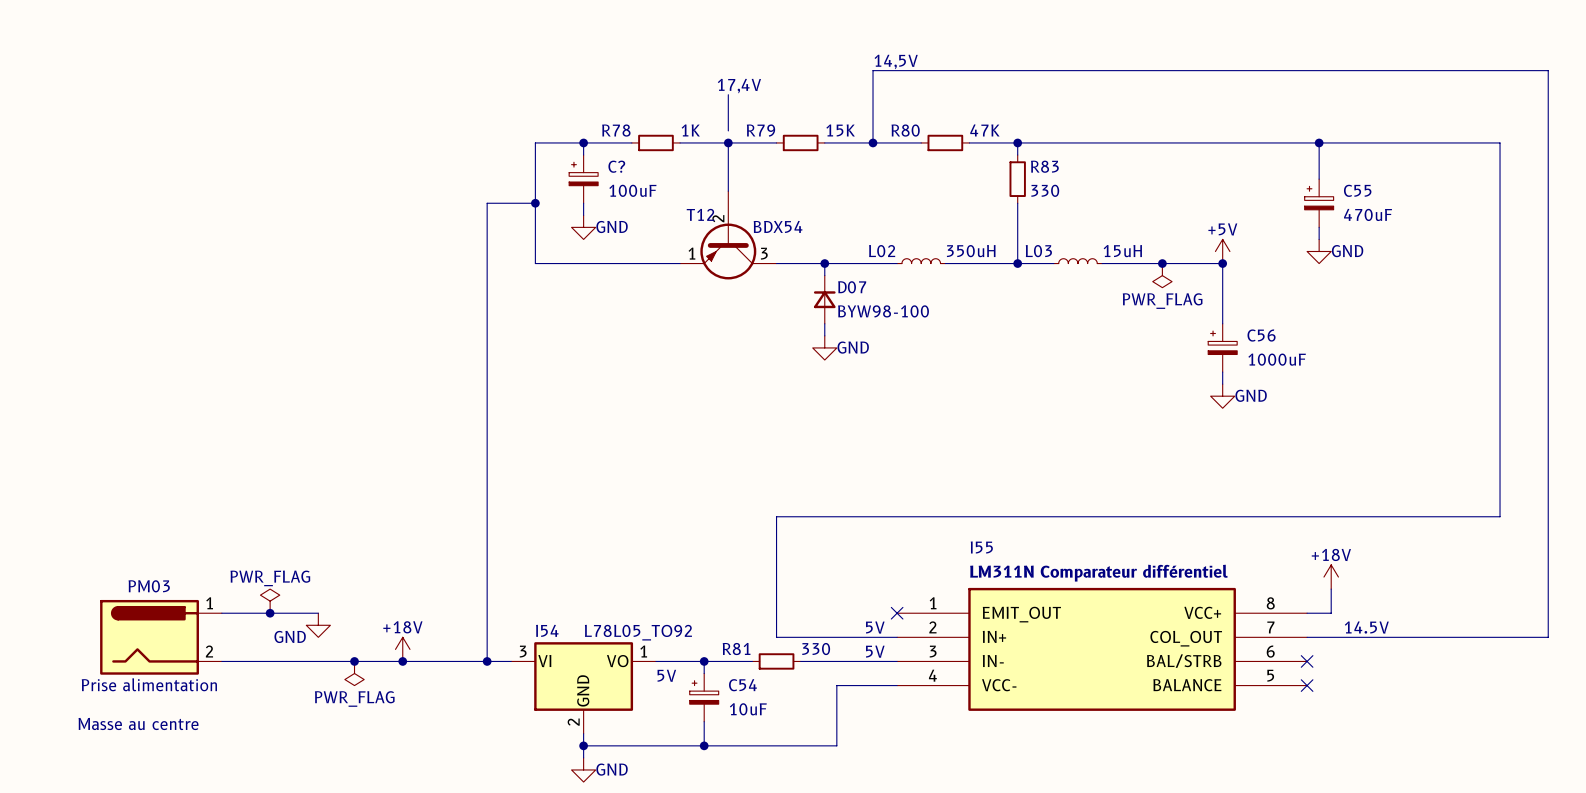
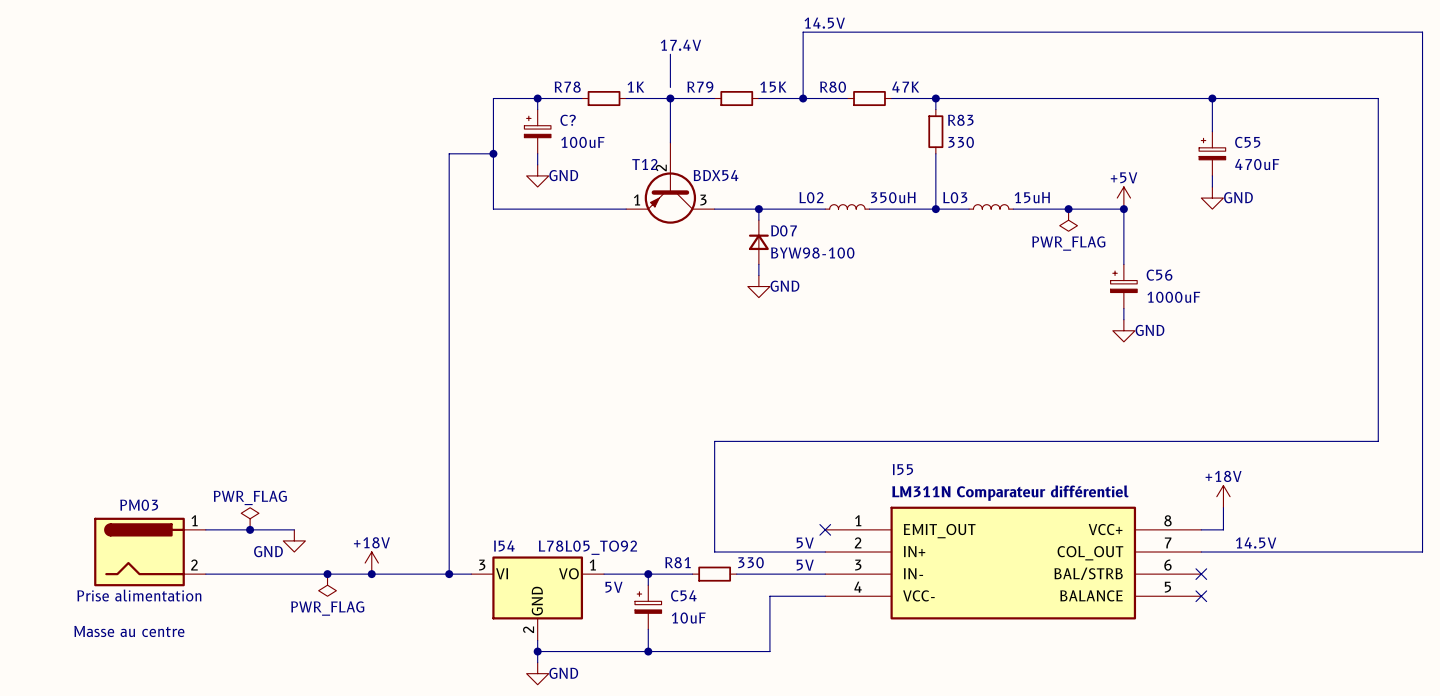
text: 14,5V (896, 61) -> 14.5V (824, 23)
text: 17,4V (739, 86) -> 17.4V (680, 45)

